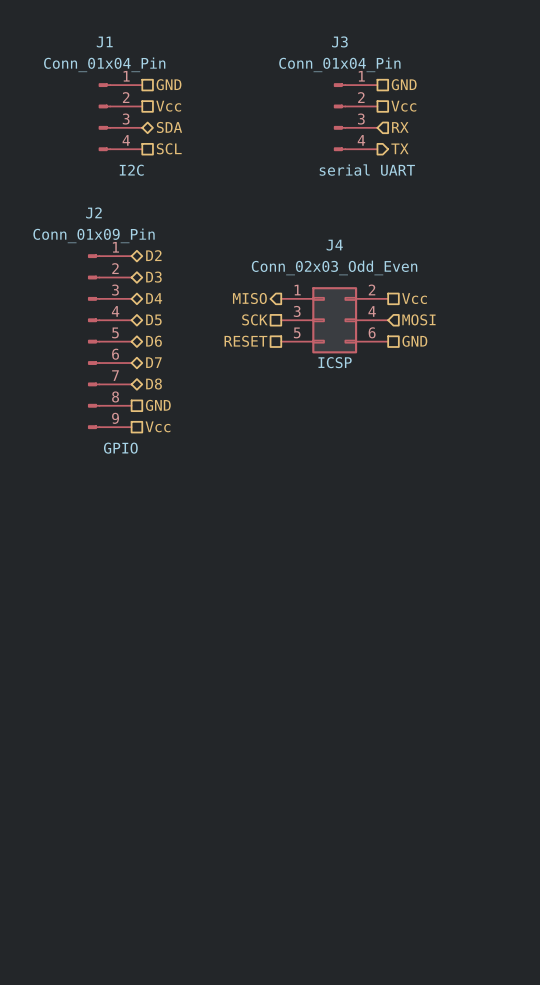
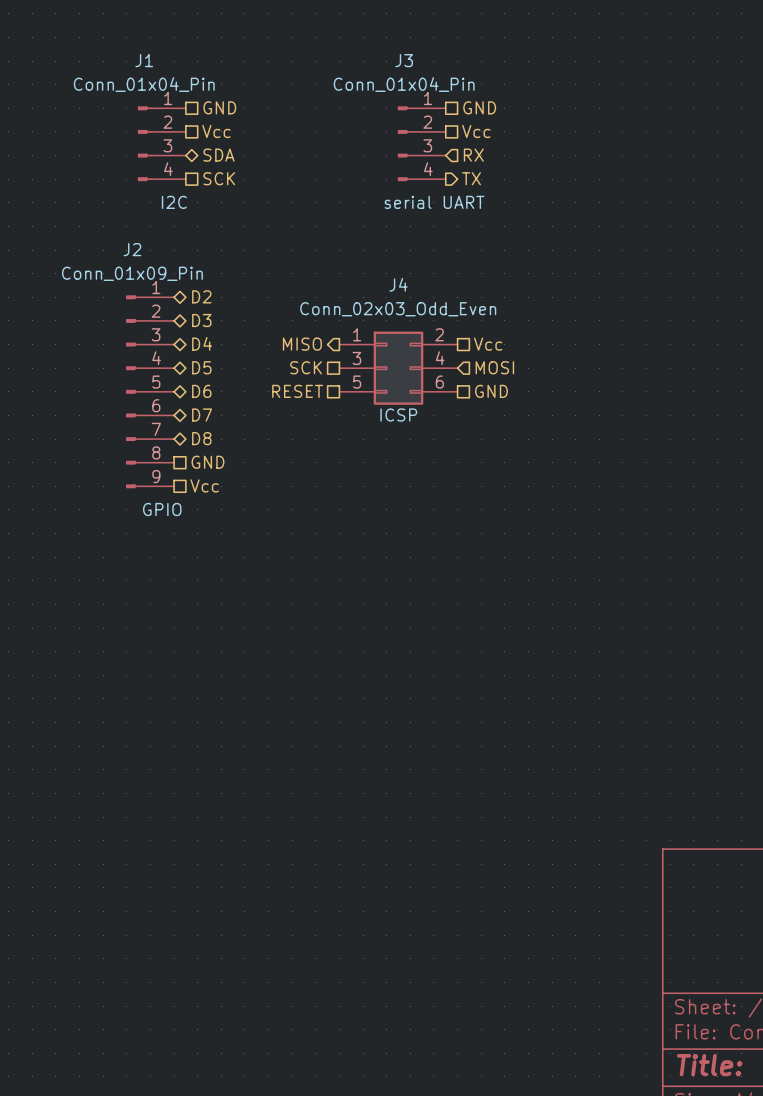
hierarchical label: SCL (169, 148) -> SCK (219, 178)

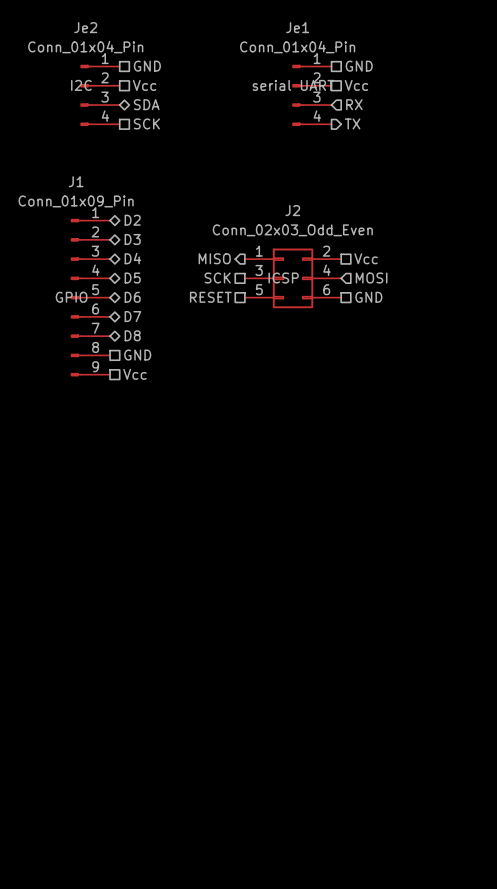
J1 name: J1 (144, 60) -> Je2 (85, 27)
J3 name: J3 (404, 60) -> Je1 (297, 27)
J1 text position: I2C (174, 202) -> I2C (81, 85)
J3 text position: serial UART (434, 202) -> serial UART (293, 85)
J2 name: J2 (132, 249) -> J1 (76, 181)
J4 name: J4 (398, 284) -> J2 (292, 210)
J4 text position: ICSP (398, 415) -> ICSP (283, 278)
J2 text position: GPIO (162, 509) -> GPIO (71, 297)

